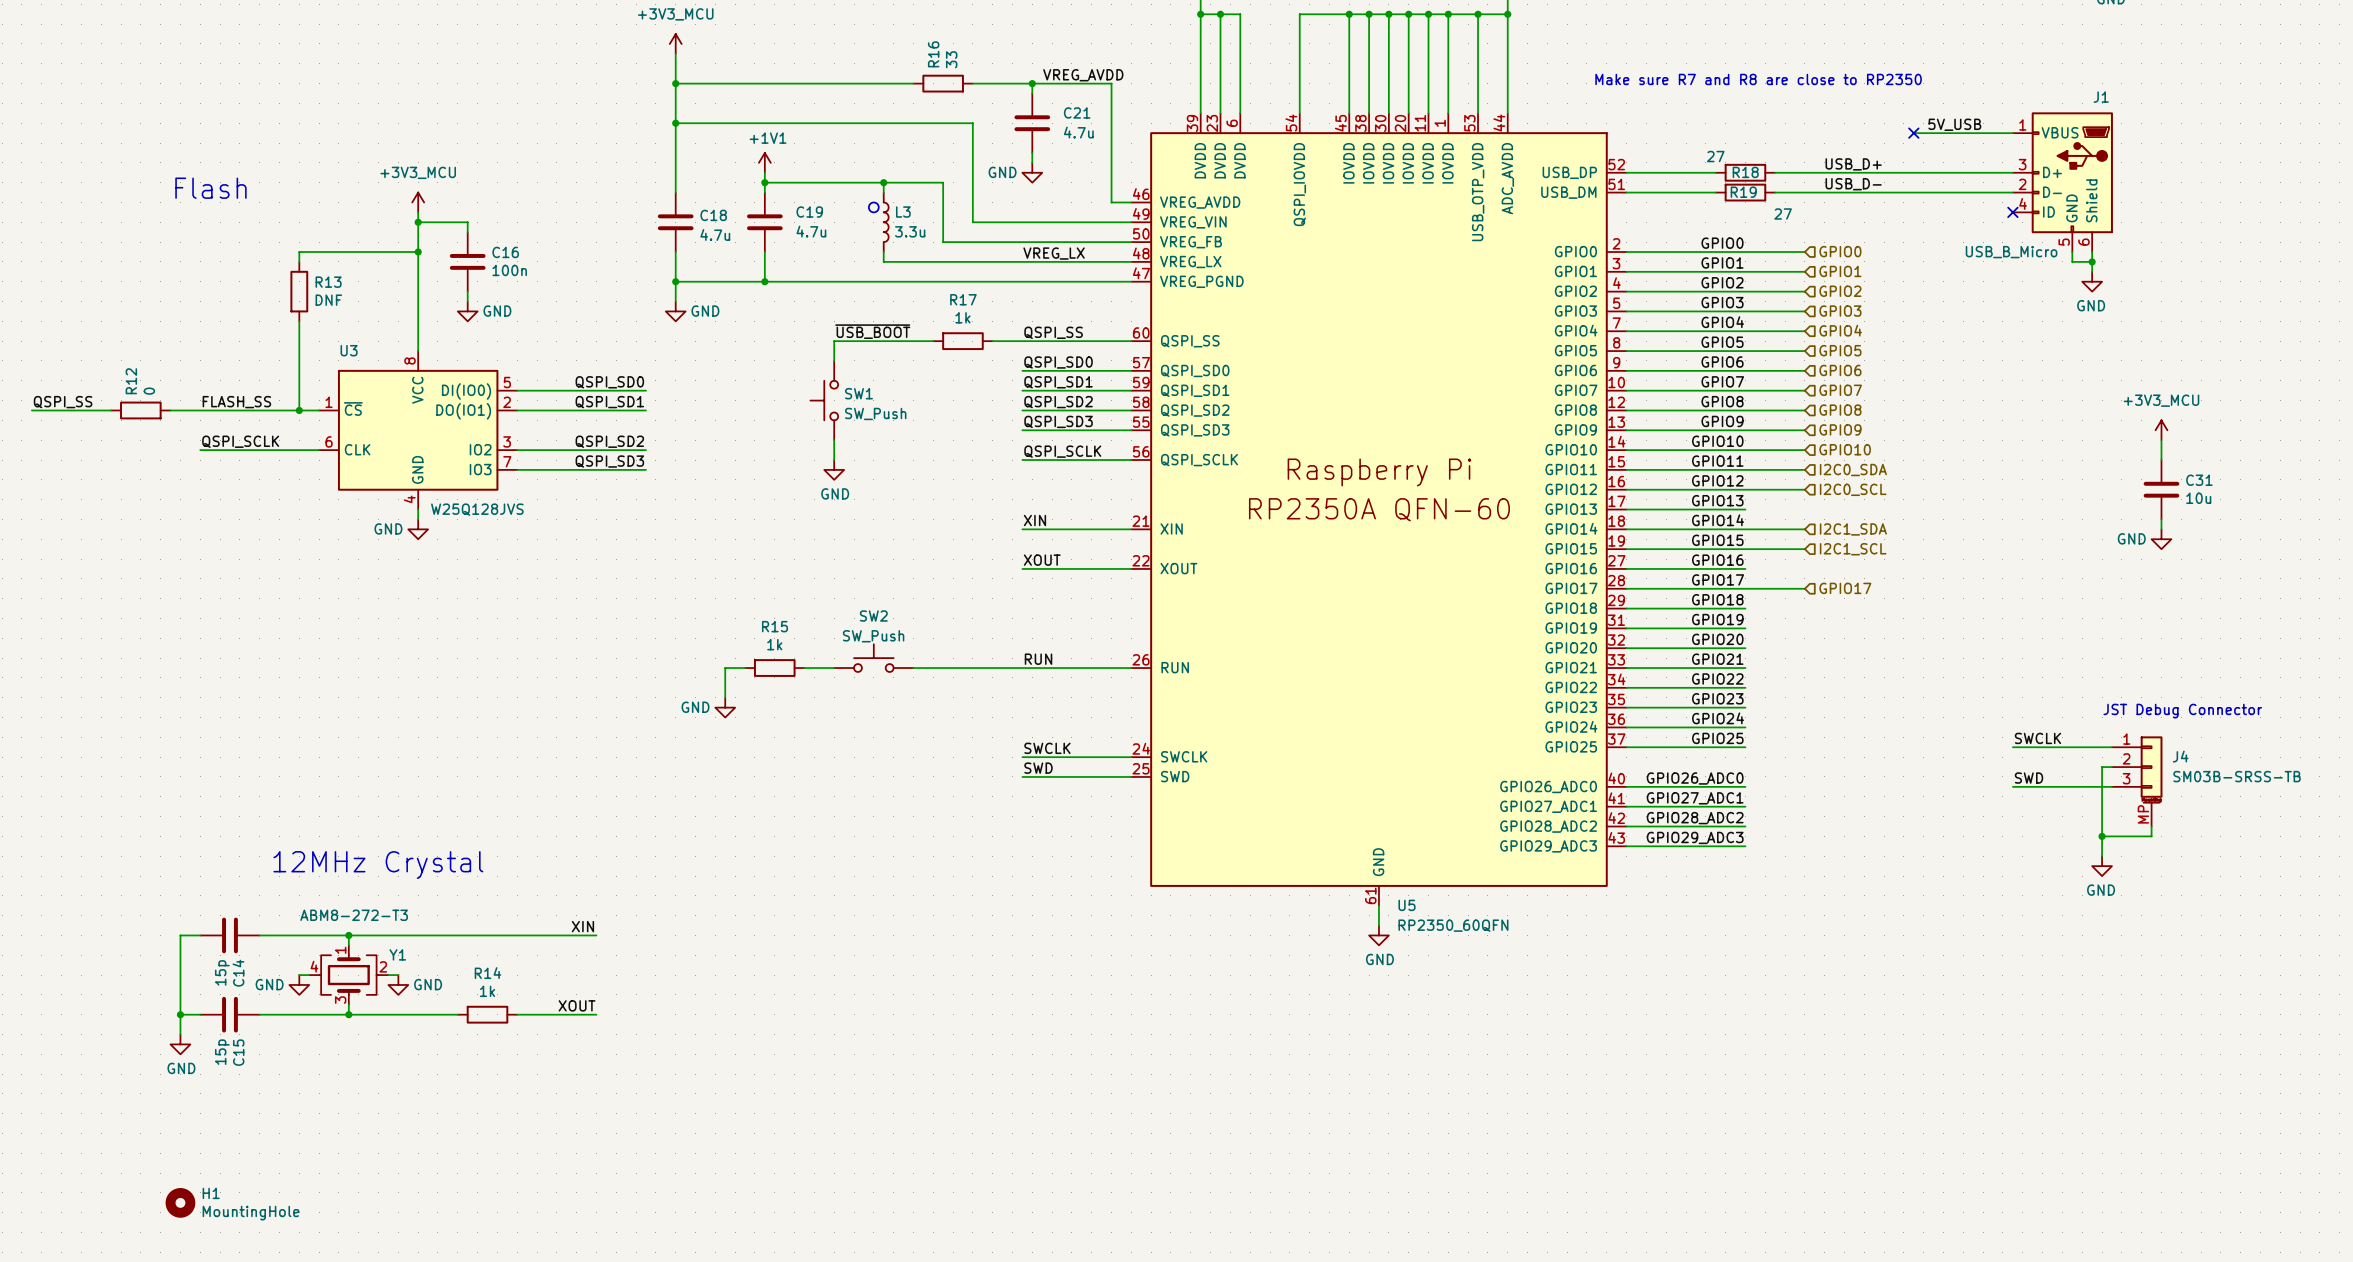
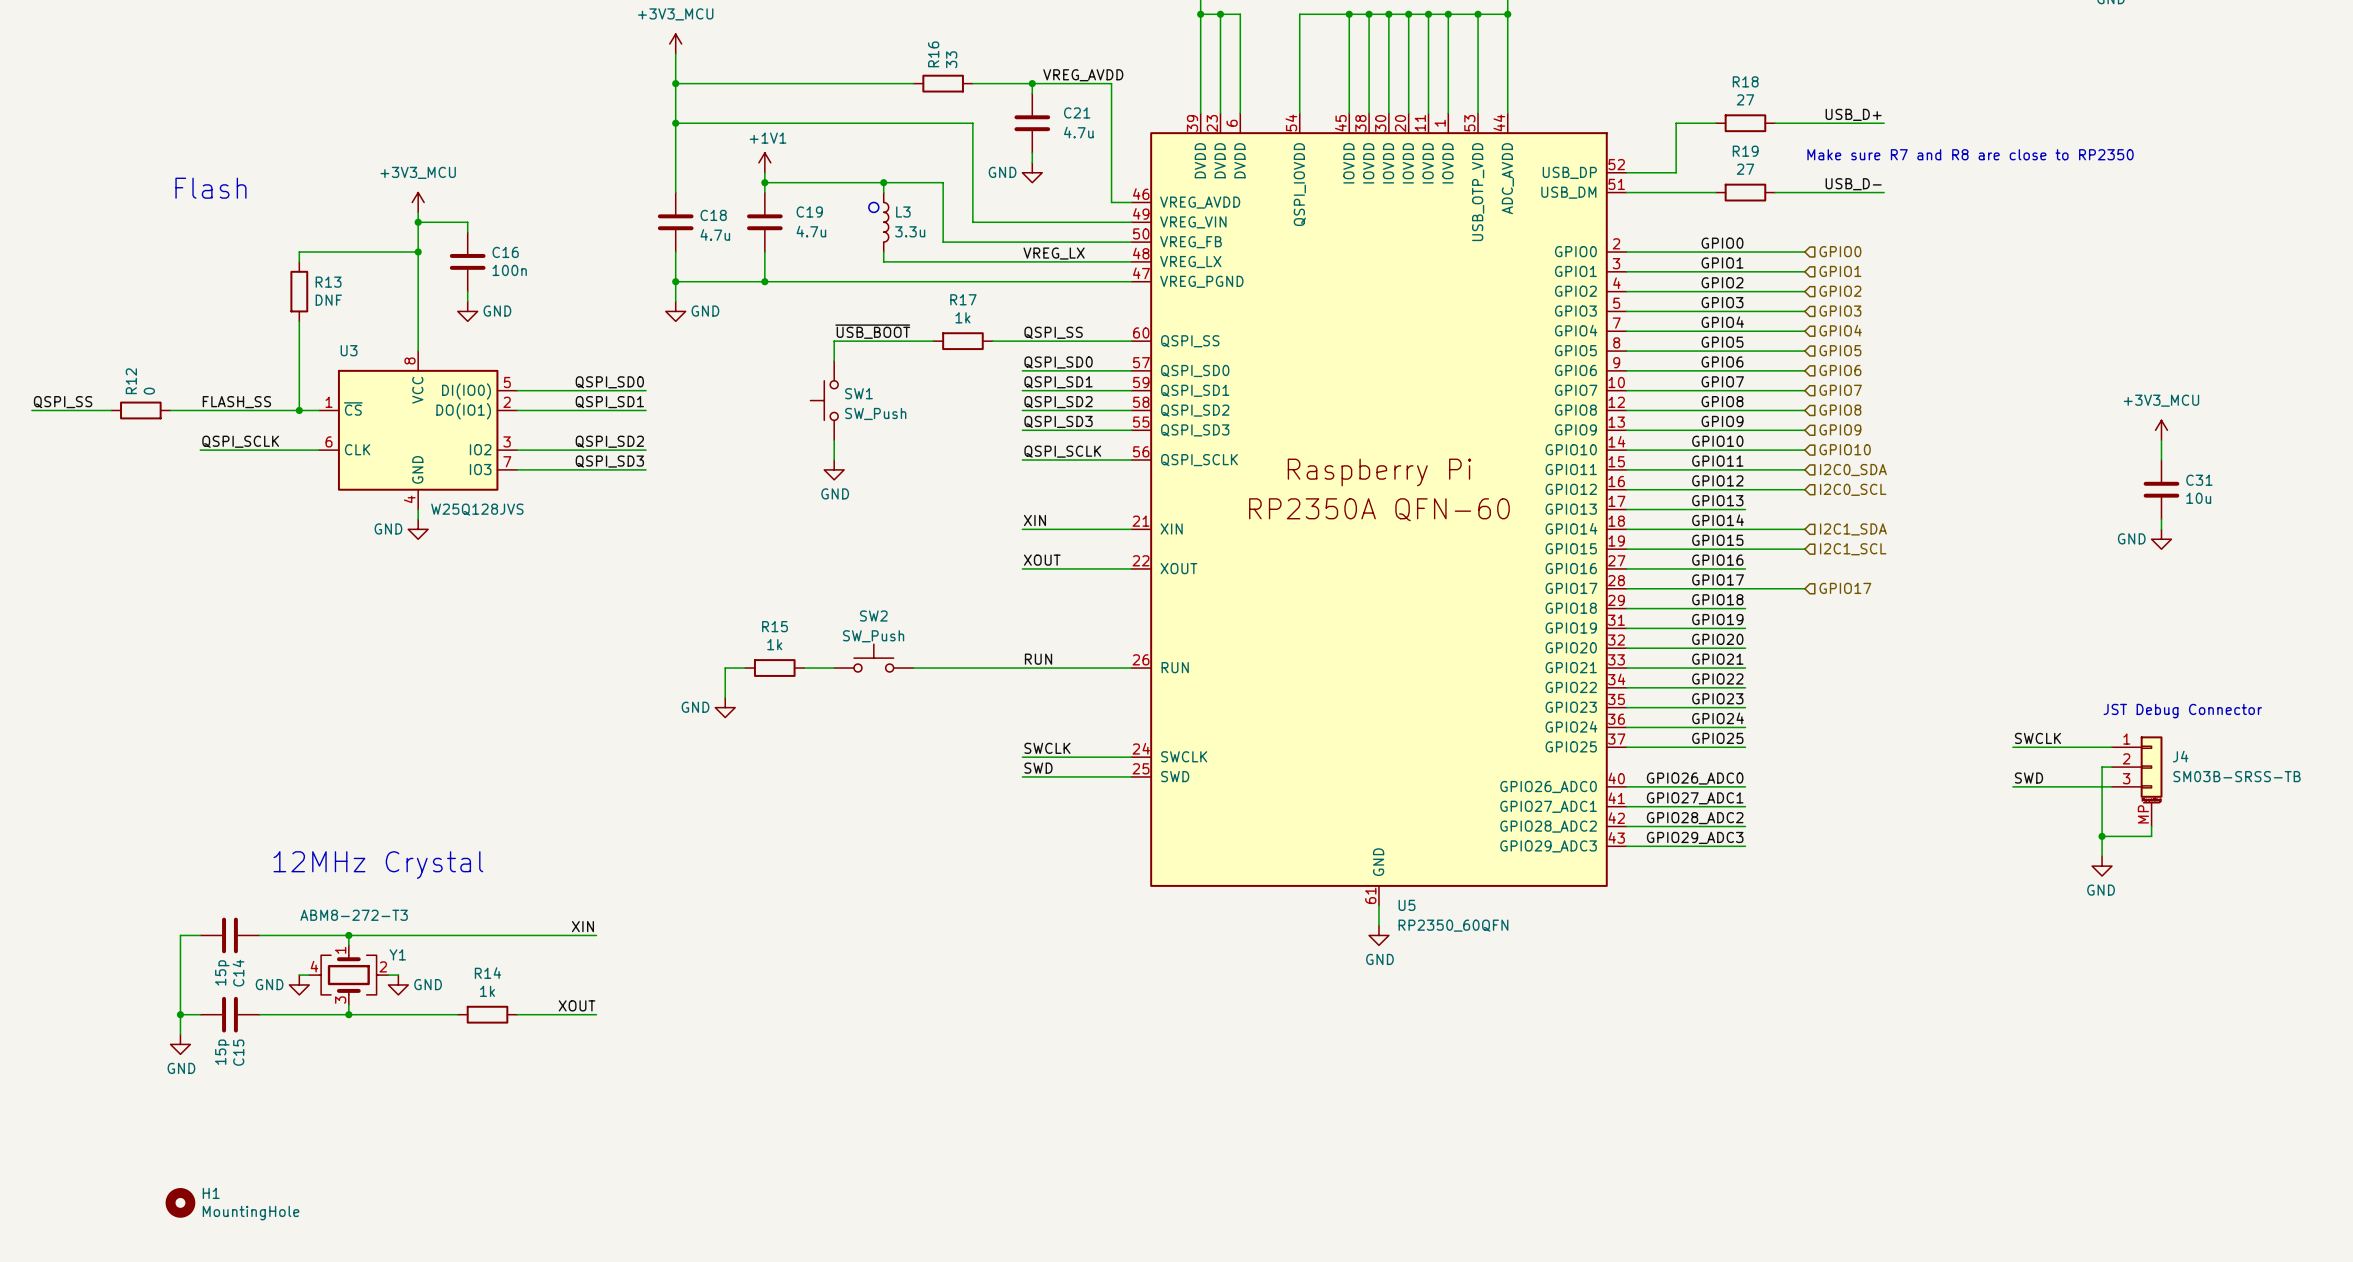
text: Make sure R7 and R8 are close to RP2350 (1758, 79) -> none
wire: none -> (1775, 123) (1884, 123)
label: 5V_USB (1954, 124) -> none
wire: (1913, 133) (2012, 133) -> none
no-connect mark: (1913, 133) -> none
text: none -> Make sure R7 and R8 are close to RP2350 (1970, 154)
R18 value position: 27 (1715, 156) -> 27 (1745, 99)
label position: USB_D+ (1853, 164) -> USB_D+ (1853, 114)
wire: (1676, 172) (1715, 172) -> (1676, 172) (1676, 123) (1715, 123)
R18 position: (1745, 172) -> (1745, 123)
R18 name position: R18 (1745, 172) -> R18 (1745, 81)
wire: (1775, 172) (2012, 172) -> none
J1: USB_B_Micro (2062, 182) -> none
R19 name position: R19 (1743, 192) -> R19 (1745, 151)
wire: (1884, 192) (2012, 192) -> none
no-connect mark: (2012, 212) -> none
R19 value position: 27 (1783, 213) -> 27 (1745, 169)
wire: (2072, 252) (2072, 261) (2092, 261) -> none
wire: (2092, 252) (2092, 271) -> none
junction: (2092, 261) -> none
power symbol: GND (2092, 281) -> none

